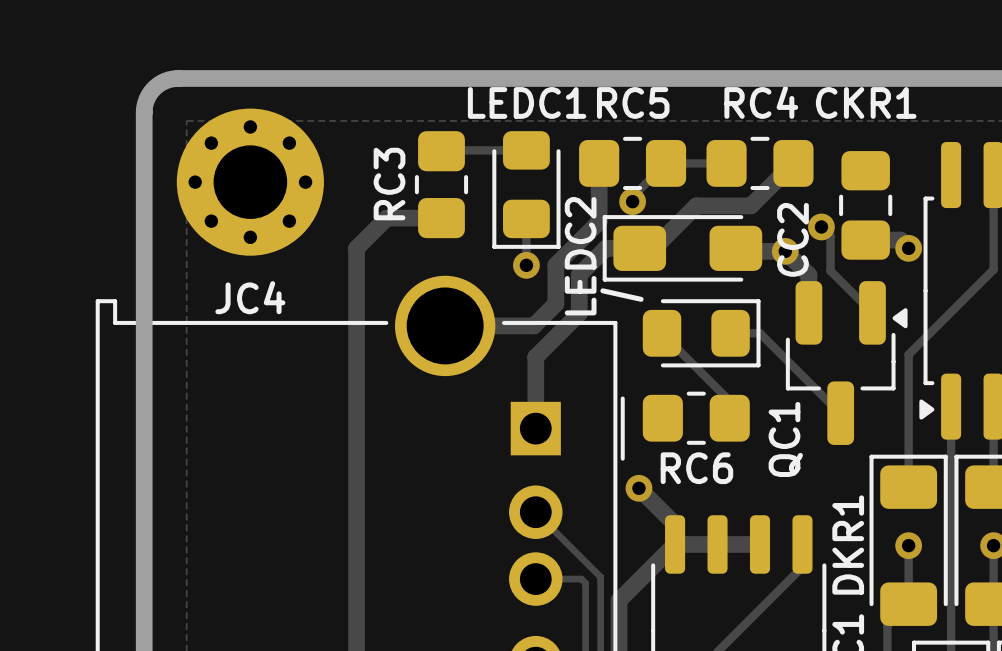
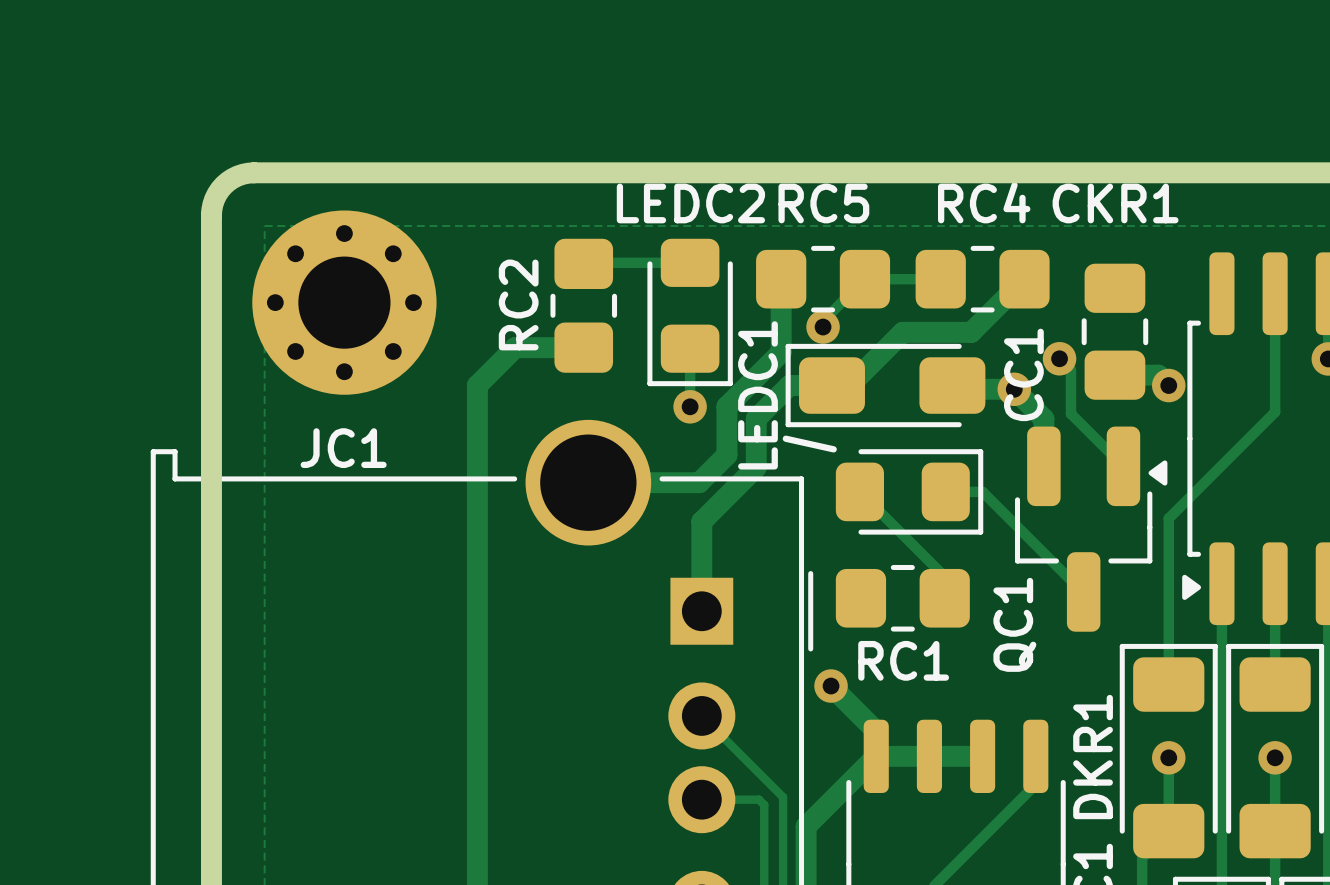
LEDC1 name: LEDC1 (527, 102) -> LEDC2 (690, 203)
RC3 name: RC3 (389, 184) -> RC2 (518, 304)
CC2 name: CC2 (792, 239) -> CC1 (1023, 374)
LEDC2 name: LEDC2 (580, 256) -> LEDC1 (757, 395)
JC4 name: JC4 (250, 297) -> JC1 (343, 448)
RC6 name: RC6 (696, 468) -> RC1 (903, 660)

